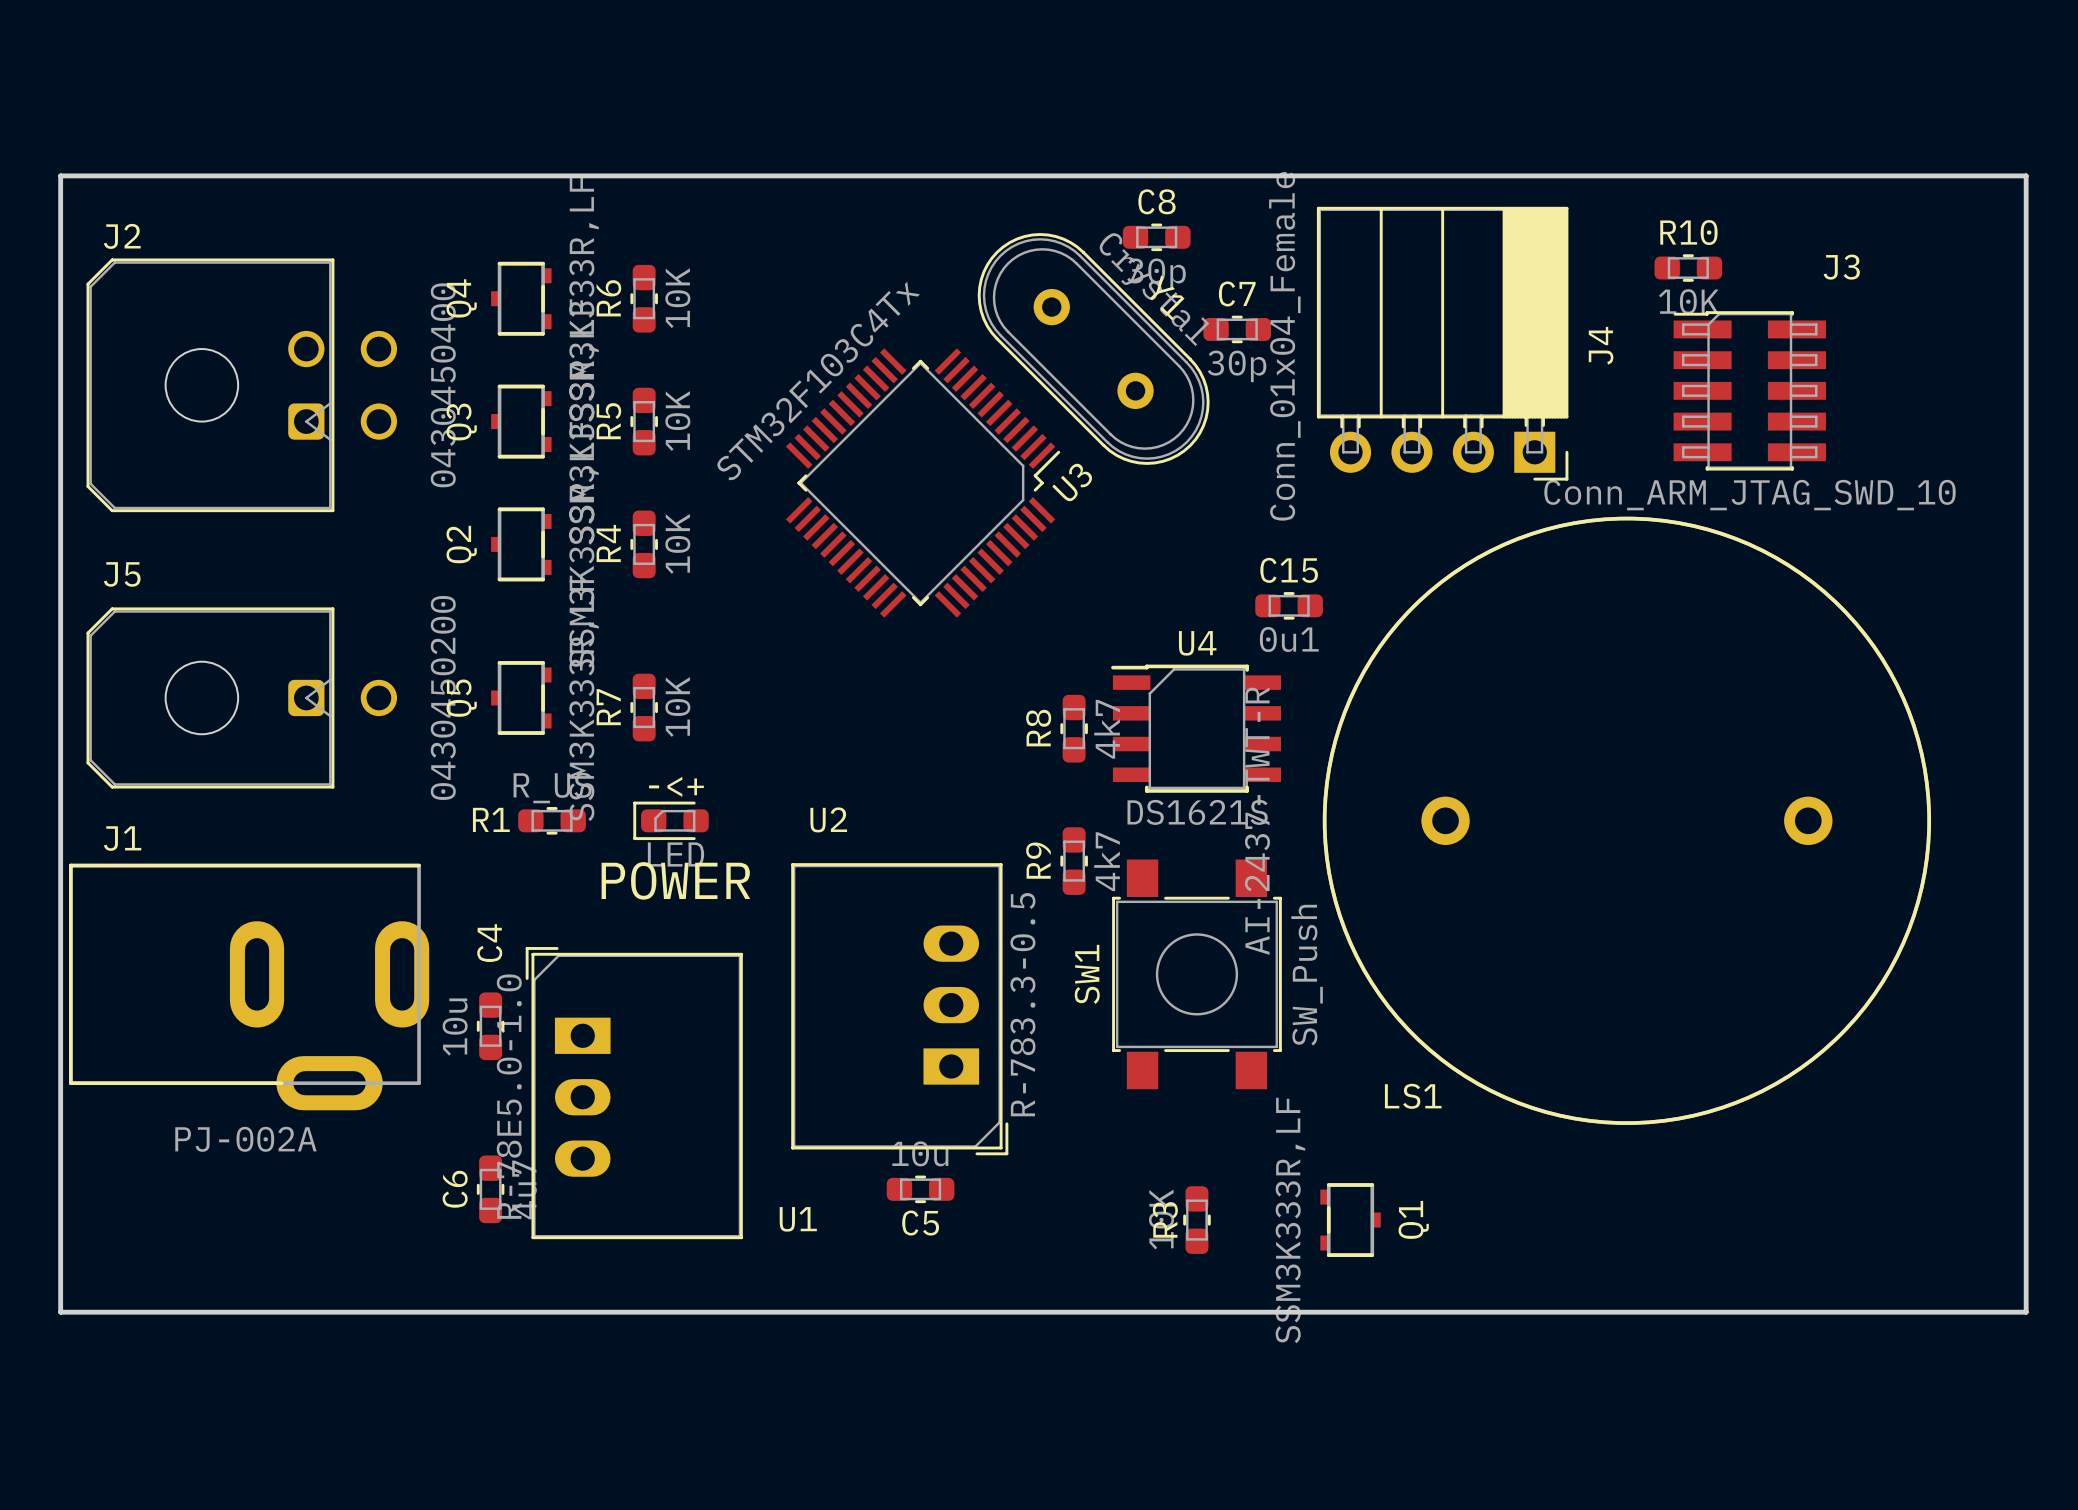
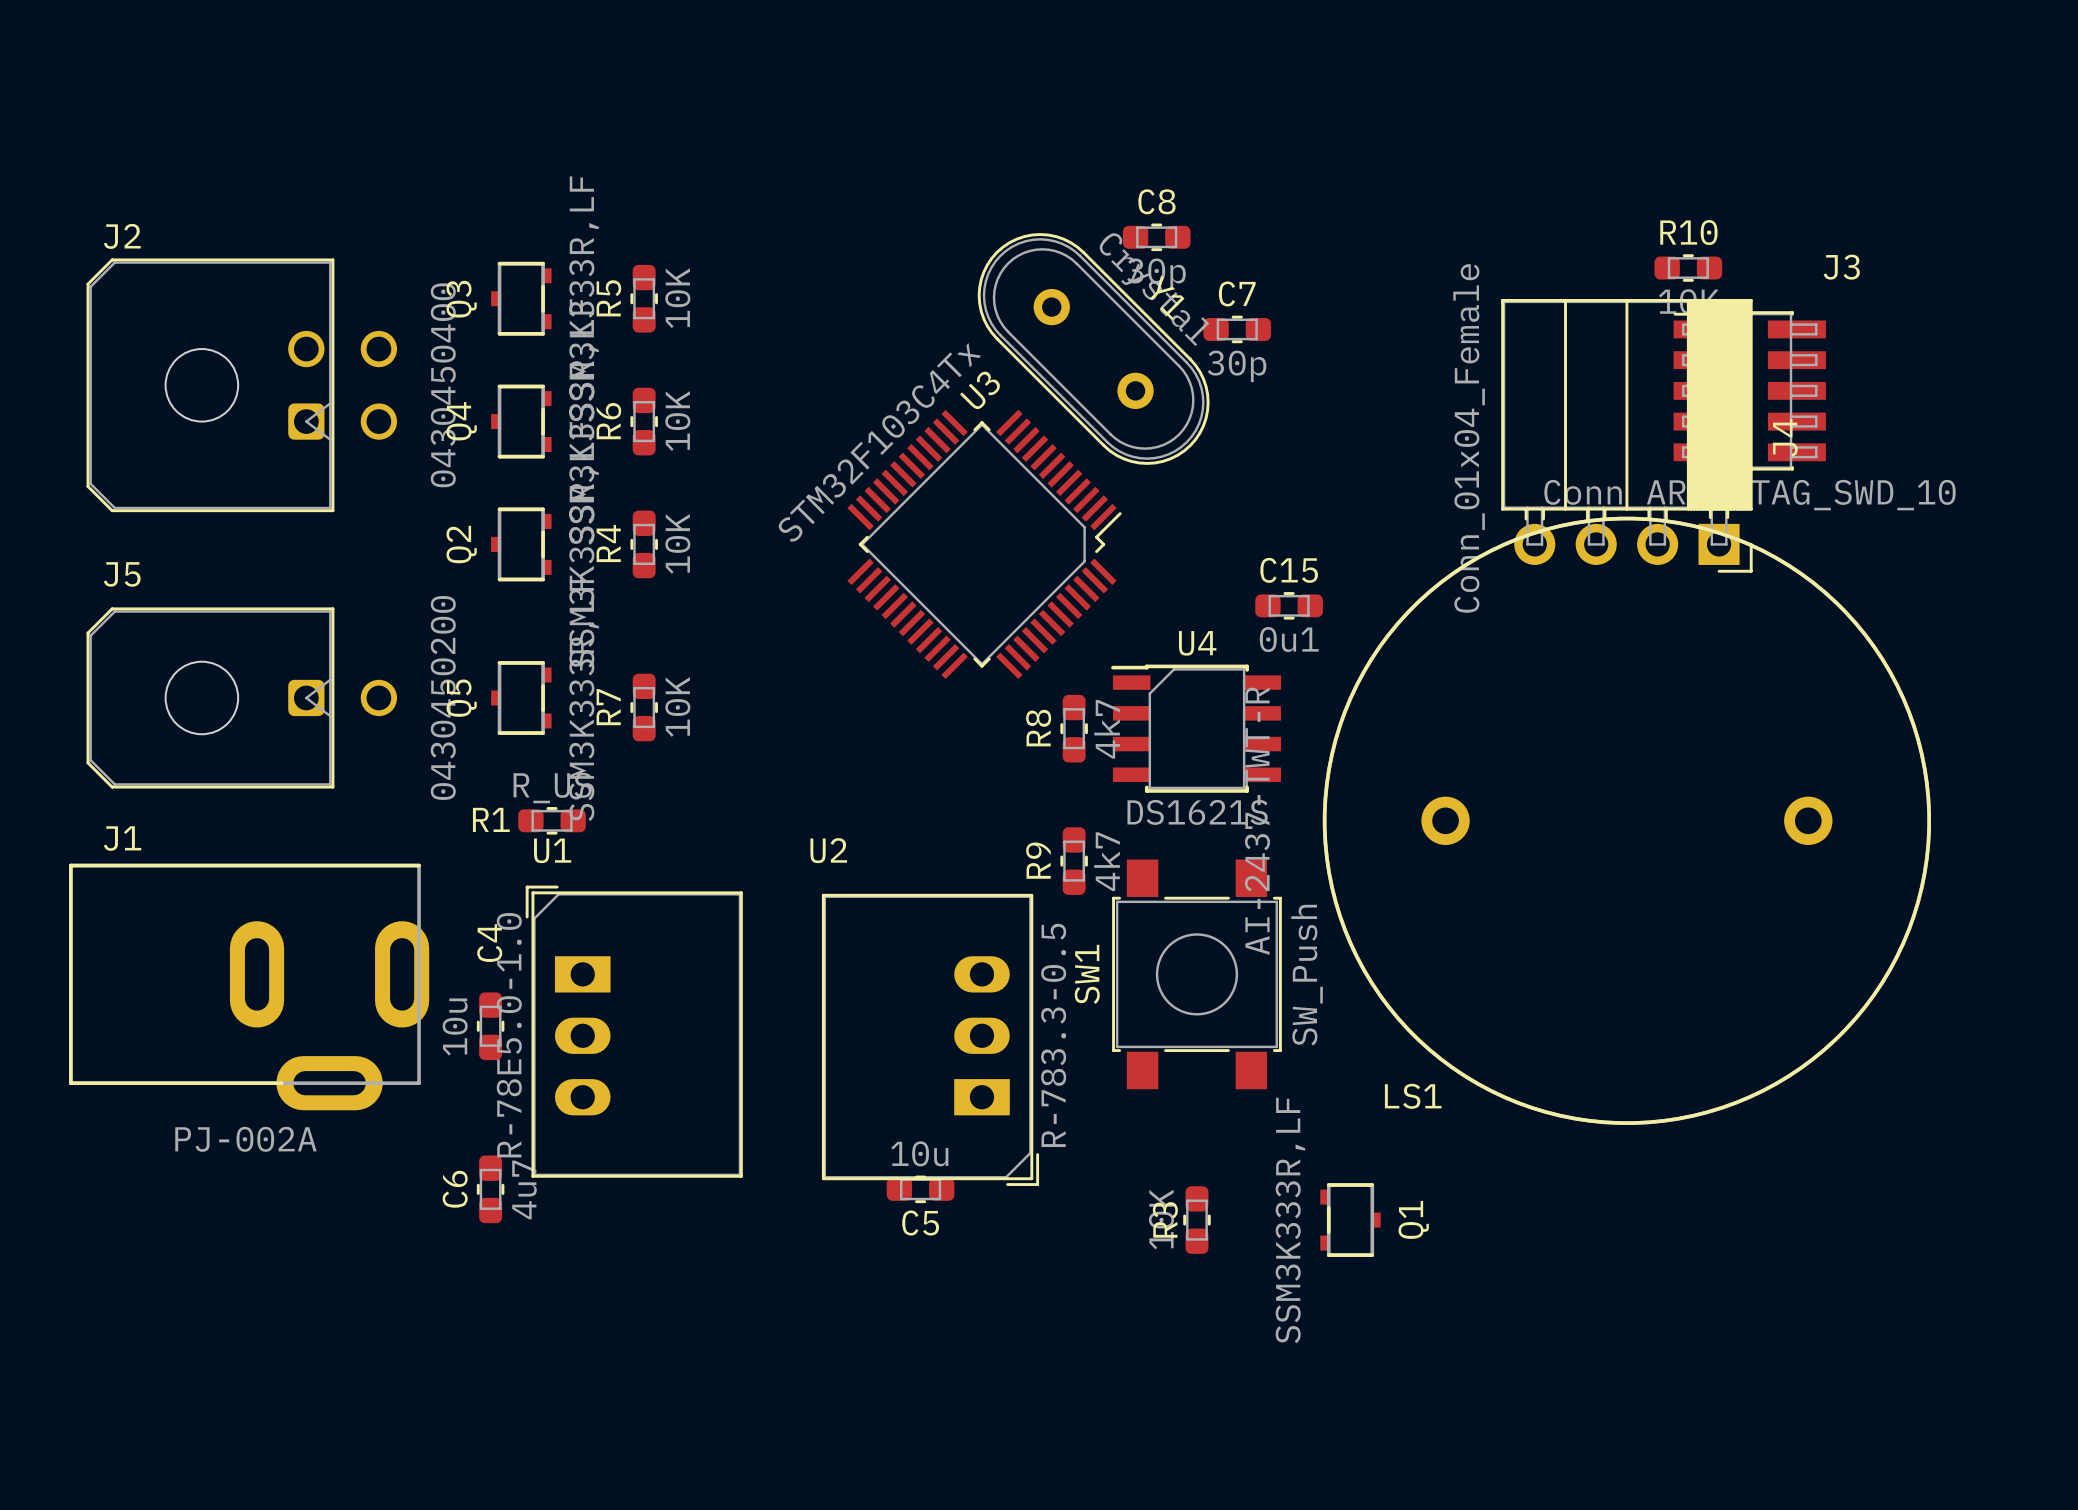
board edge: (60, 175) (2026, 175) (2026, 1312) (60, 1312) (60, 175) -> none
Q4 name: Q4 (461, 298) -> Q3 (461, 299)
R6 name: R6 (608, 298) -> R5 (608, 298)
J4 position: (1442, 343) -> (1626, 435)
R5 name: R5 (608, 421) -> R6 (608, 421)
Q3 name: Q3 (461, 422) -> Q4 (461, 421)
U3 name position: U3 (1072, 482) -> U3 (980, 390)
U3 position: (923, 483) -> (984, 544)
U2 name position: U2 (828, 819) -> U2 (828, 850)
part: LED (671, 820) -> none
text: POWER (675, 880) -> none
U2 position: (899, 1009) -> (930, 1039)
U1 position: (634, 1093) -> (634, 1031)
U1 name position: U1 (798, 1219) -> U1 (552, 850)

